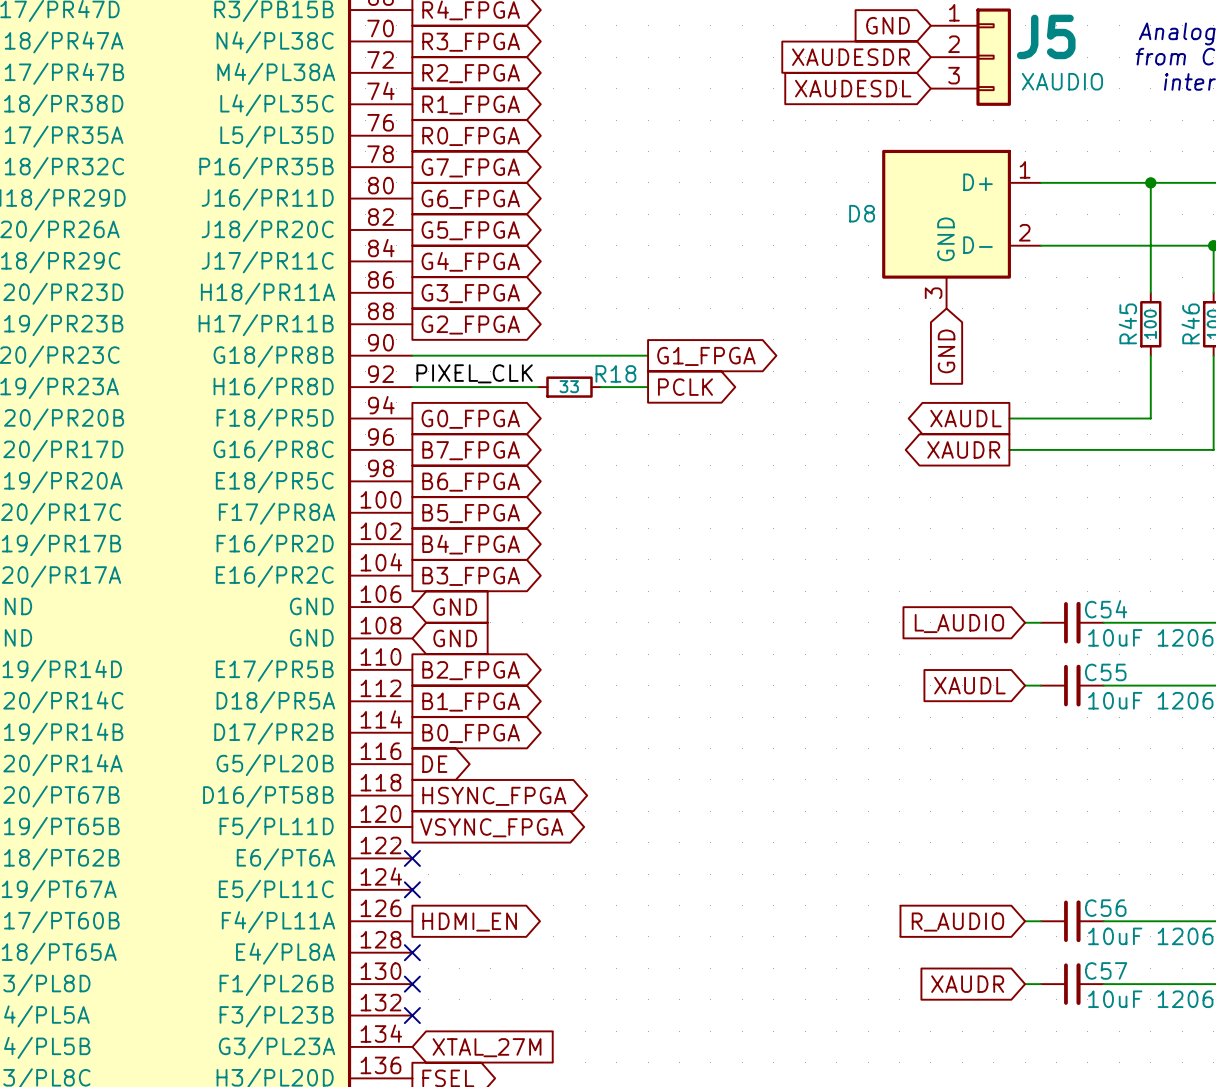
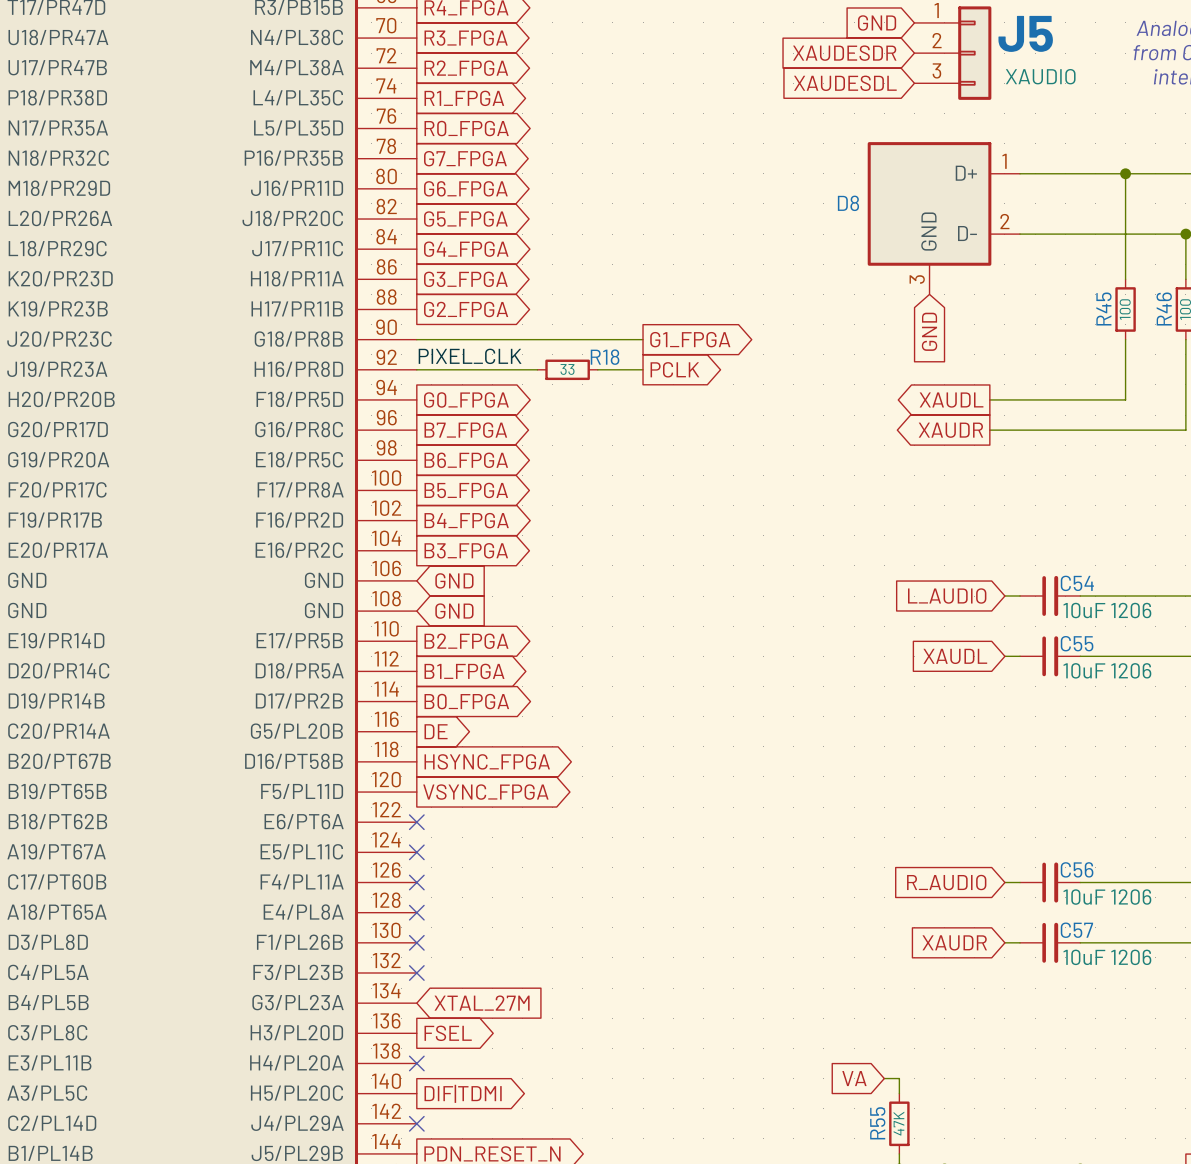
no-connect mark: none -> (416, 882)
global label: HDMI_EN (469, 922) -> none

